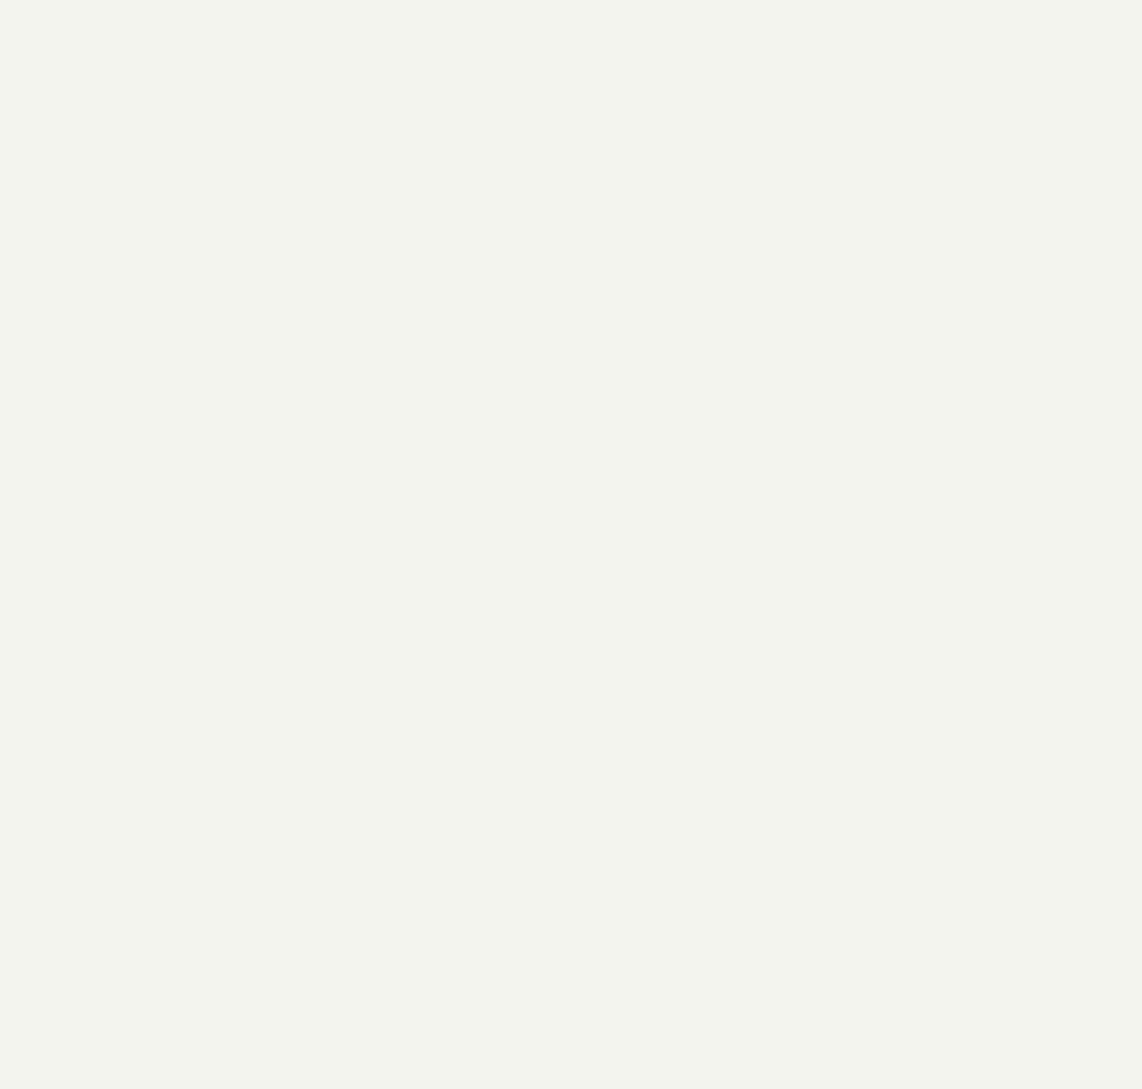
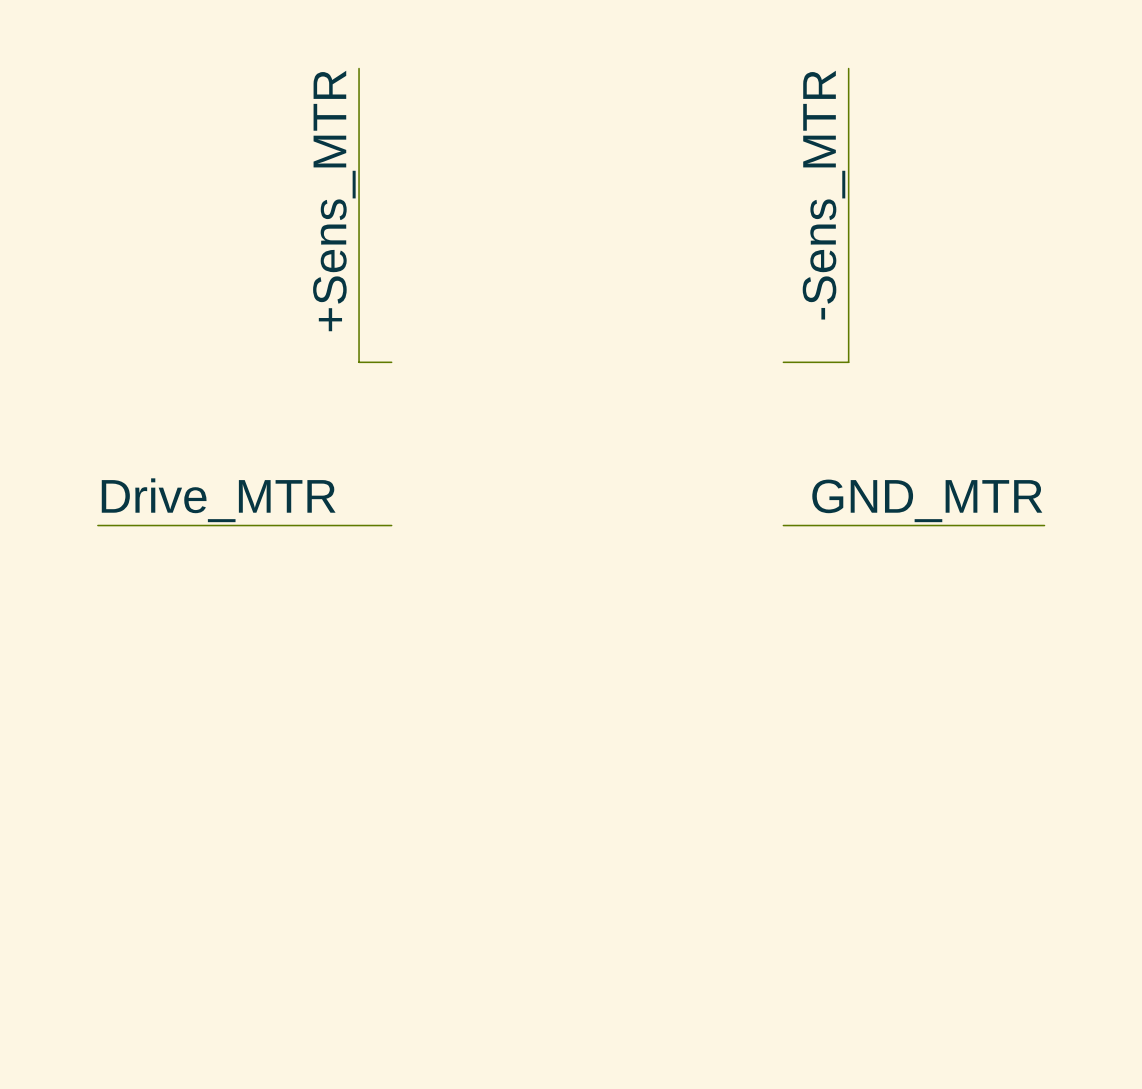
wire: none -> (359, 68) (359, 362) (391, 362)
wire: none -> (848, 68) (848, 362) (783, 362)
label: none -> -Sens_MTR (824, 195)
label: none -> +Sens_MTR (334, 200)
label: none -> Drive_MTR (218, 500)
label: none -> GND_MTR (927, 500)
wire: none -> (97, 525) (391, 525)
wire: none -> (783, 525) (1044, 525)

